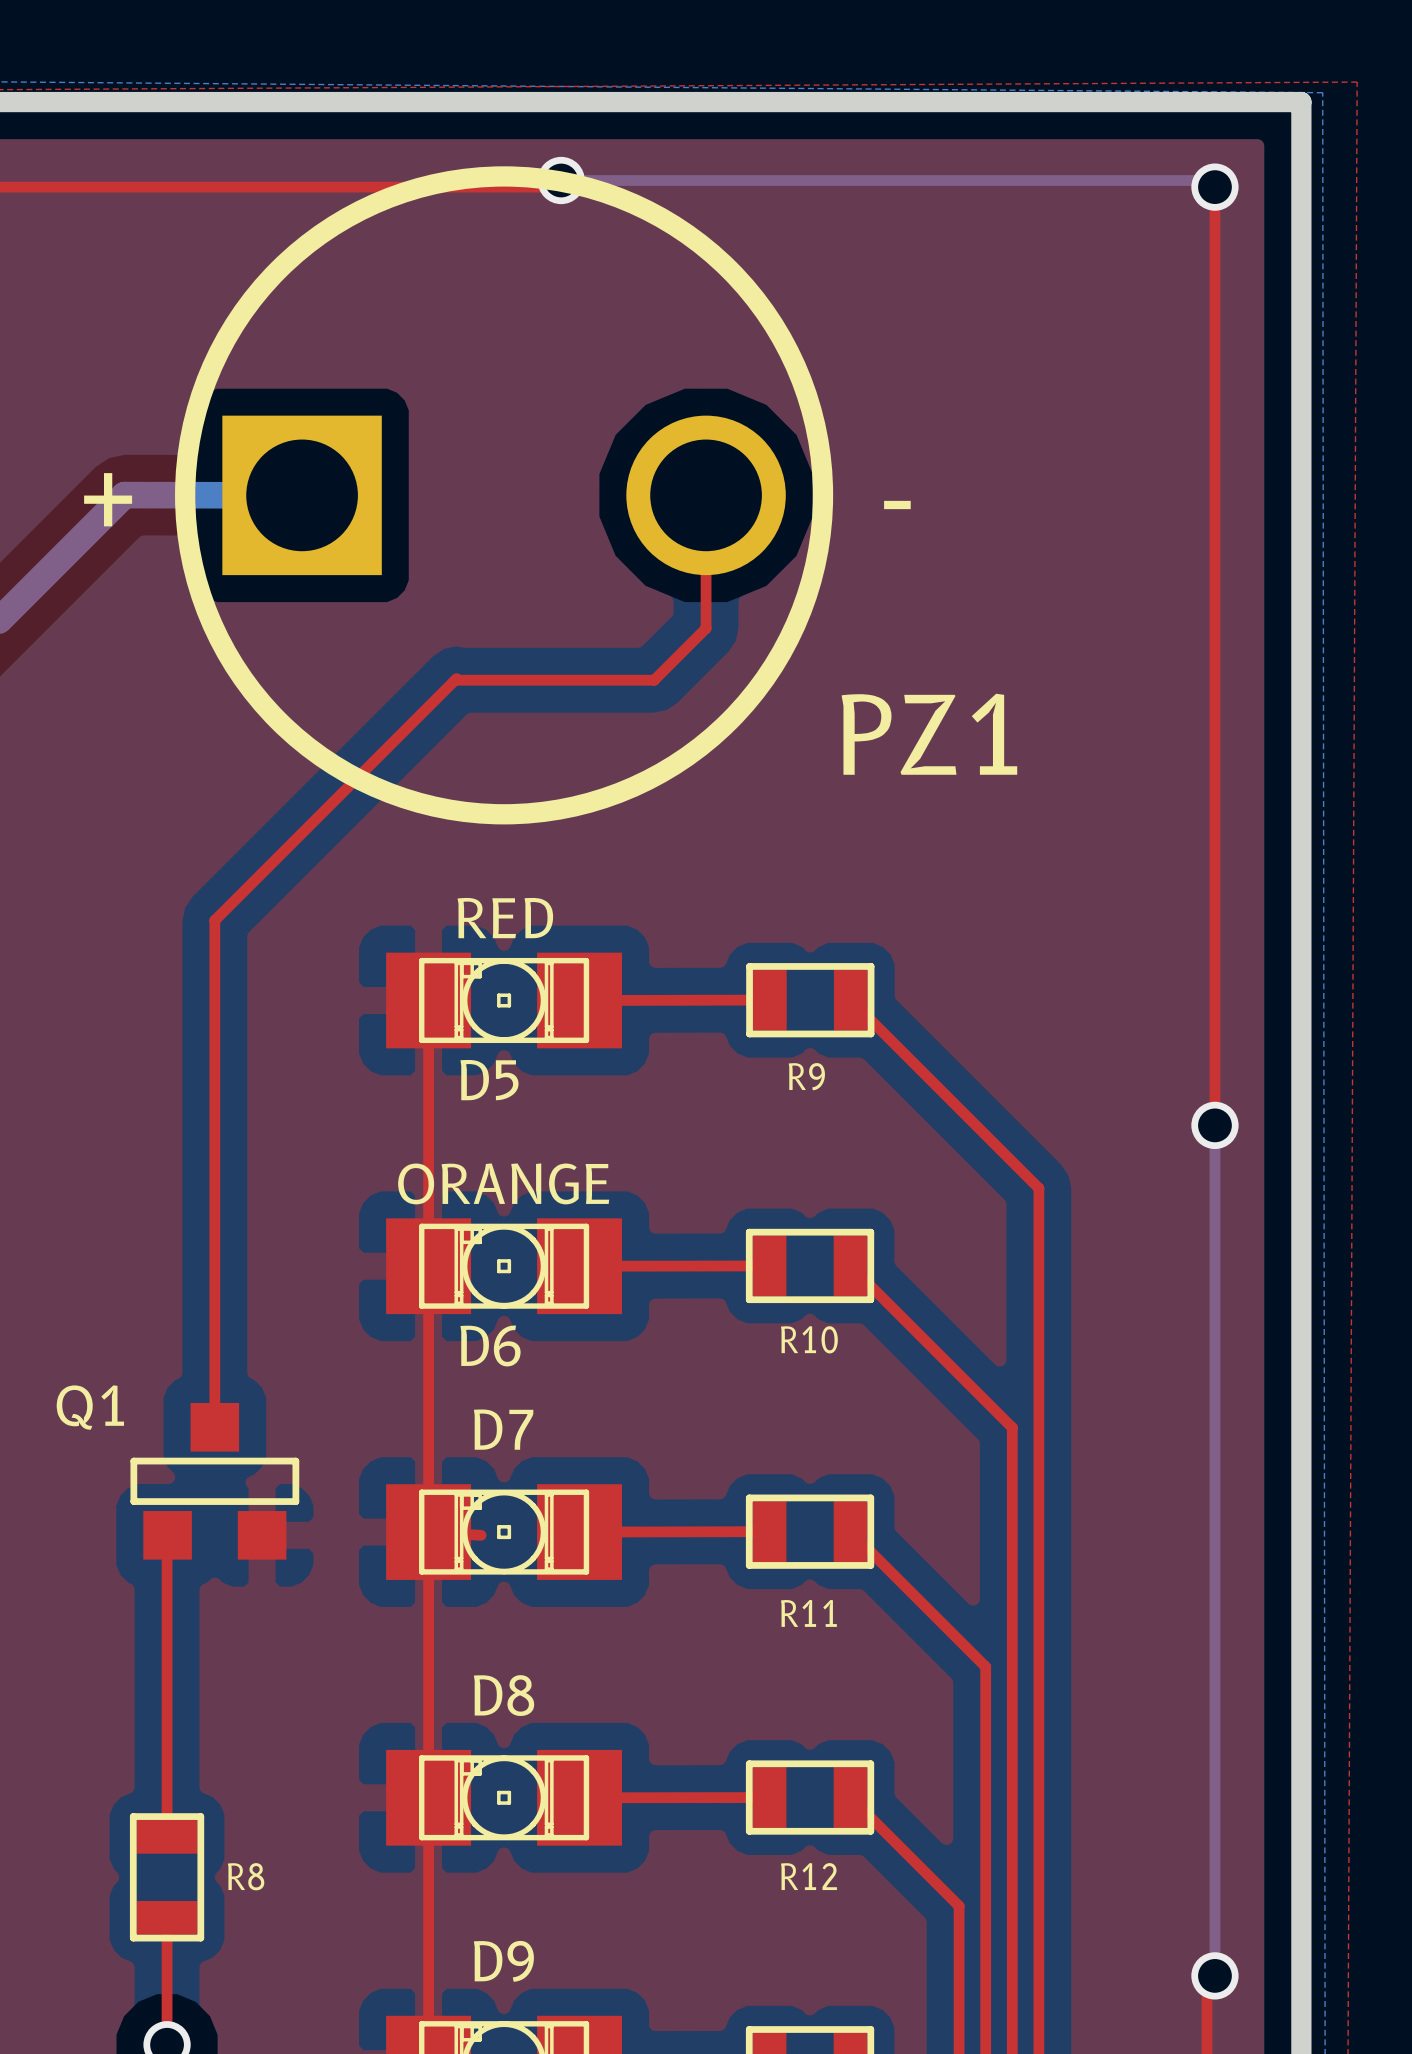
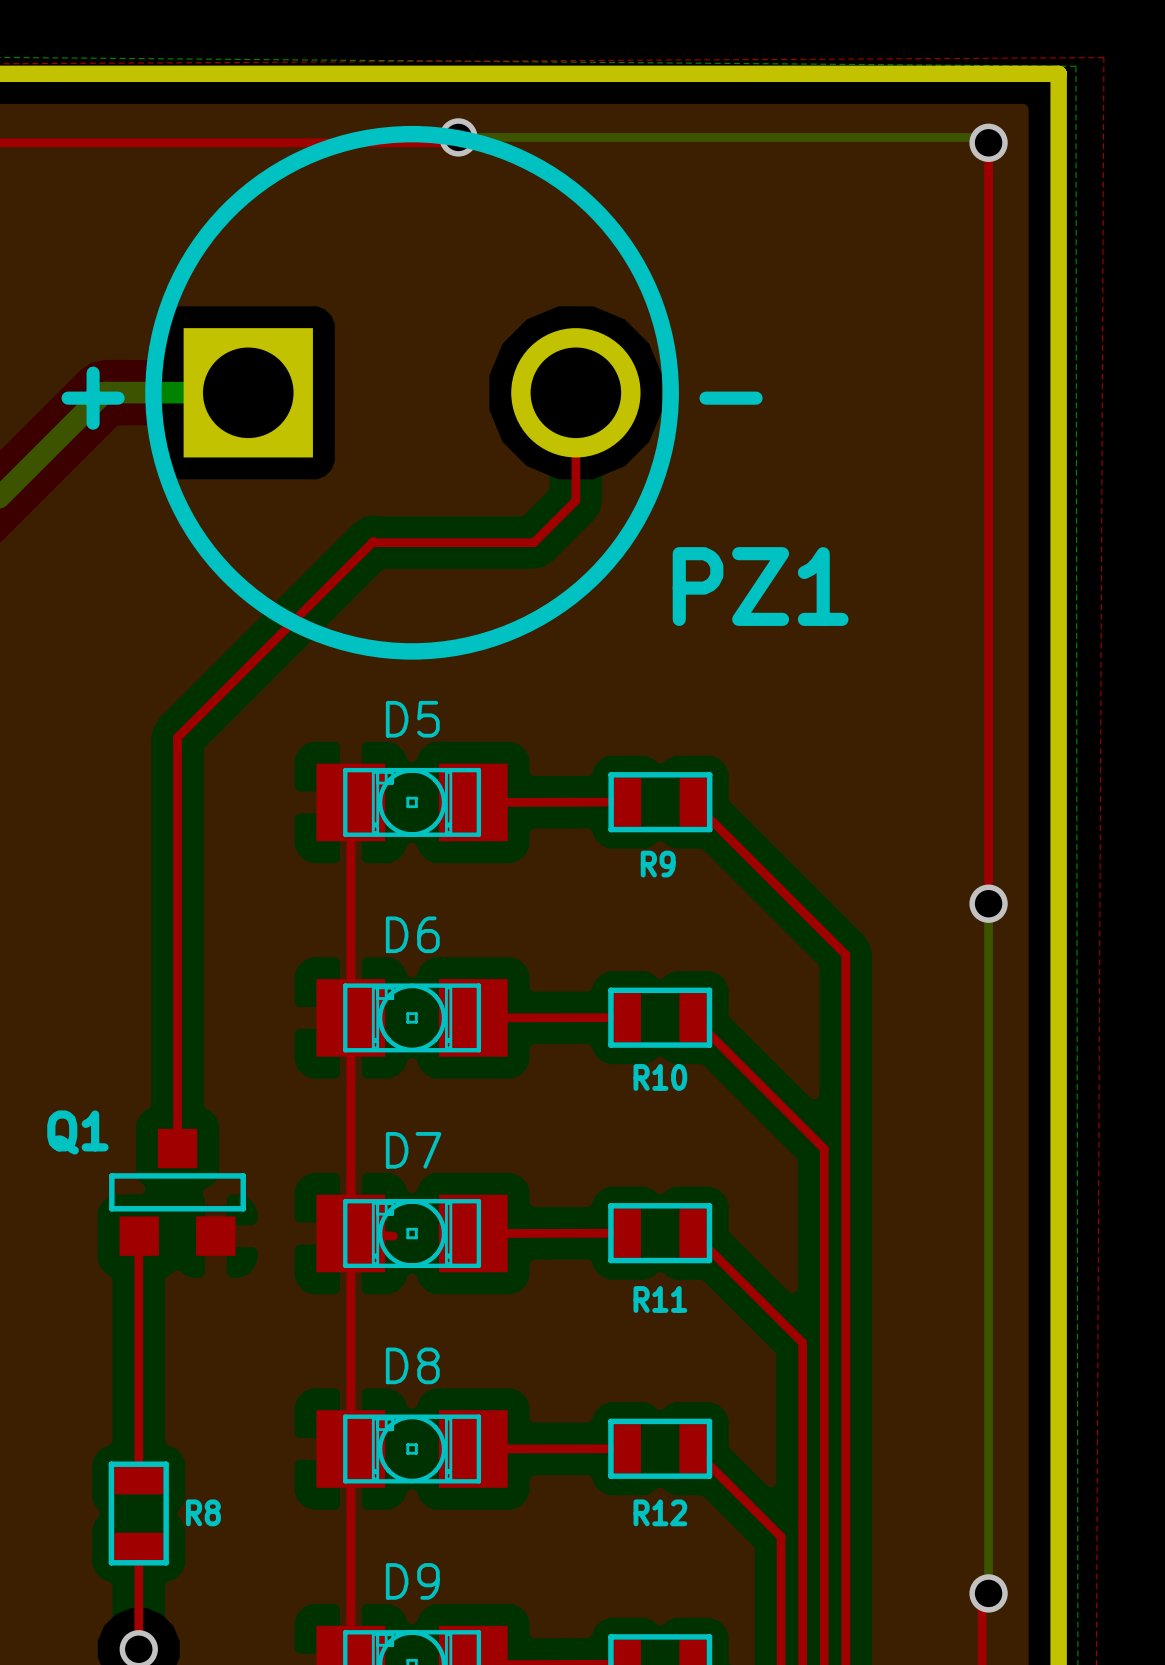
D5 value: RED (505, 918) -> none
D5 name position: D5 (489, 1080) -> D5 (412, 719)
D6 value: ORANGE (503, 1183) -> none
D6 name position: D6 (490, 1345) -> D6 (412, 934)

